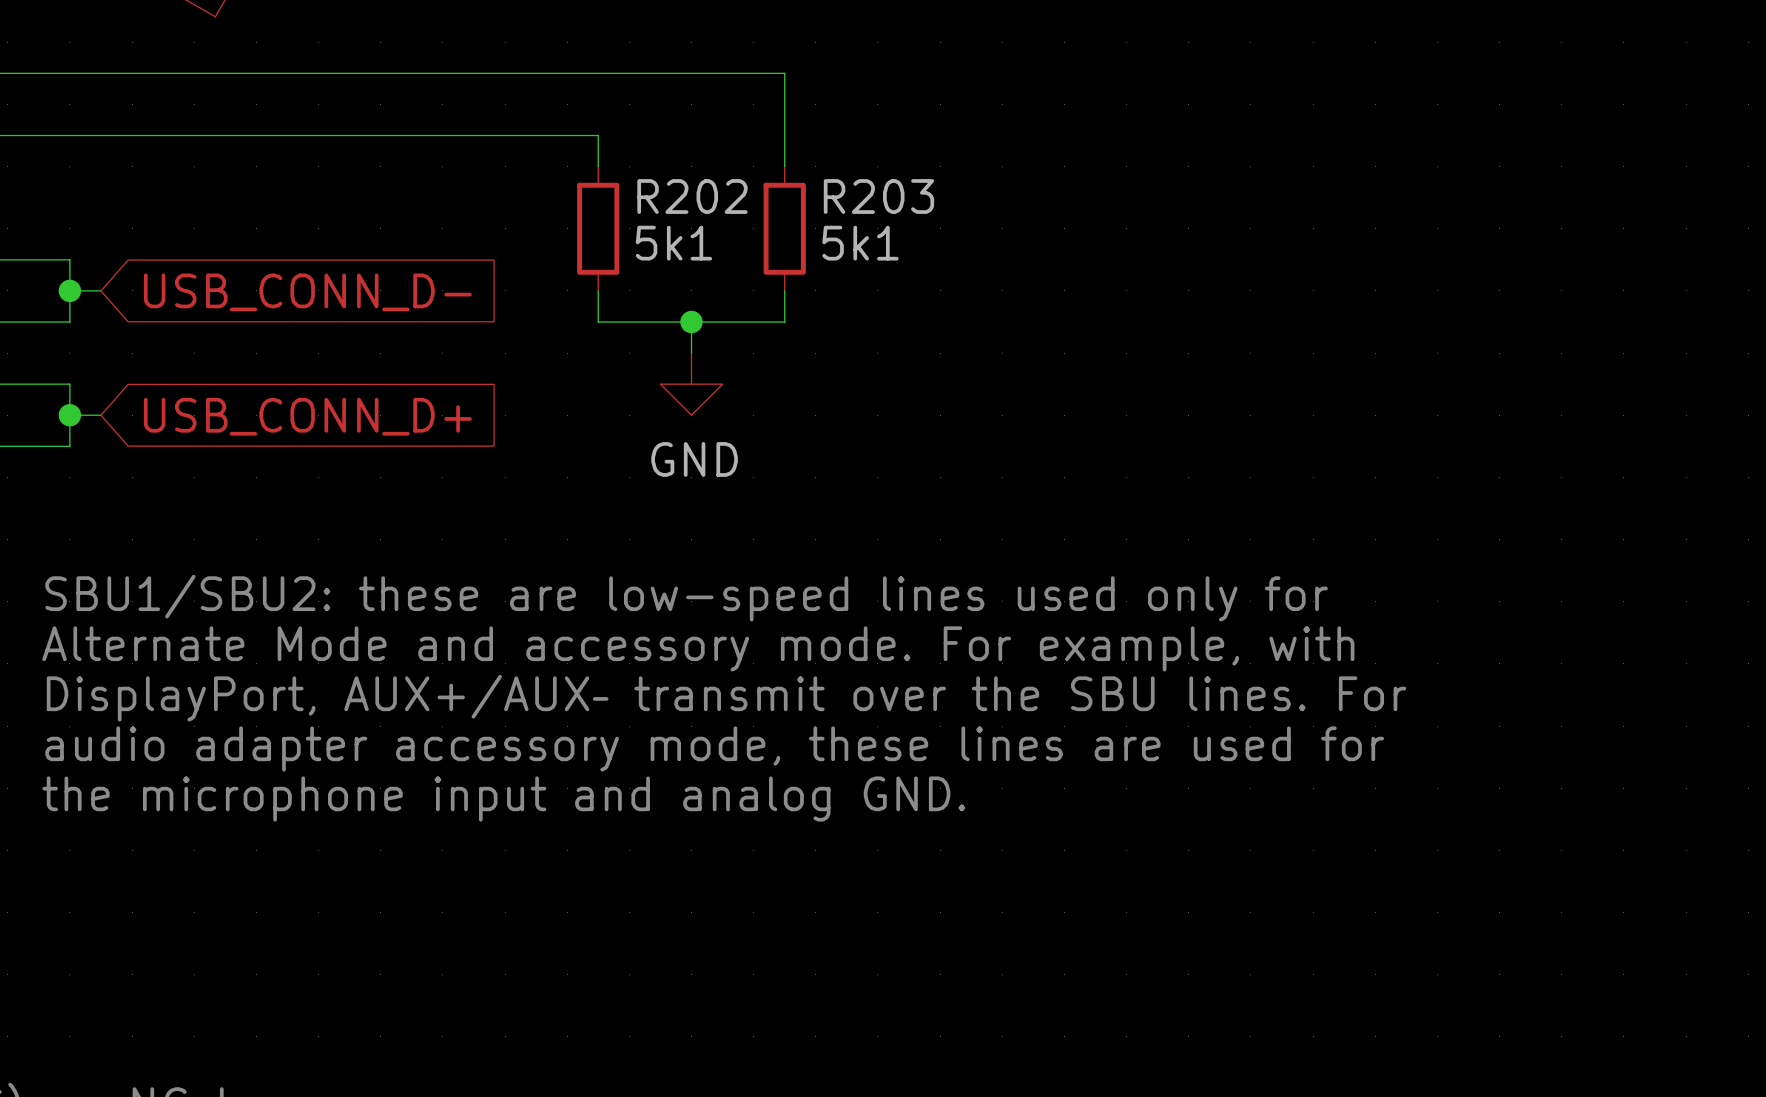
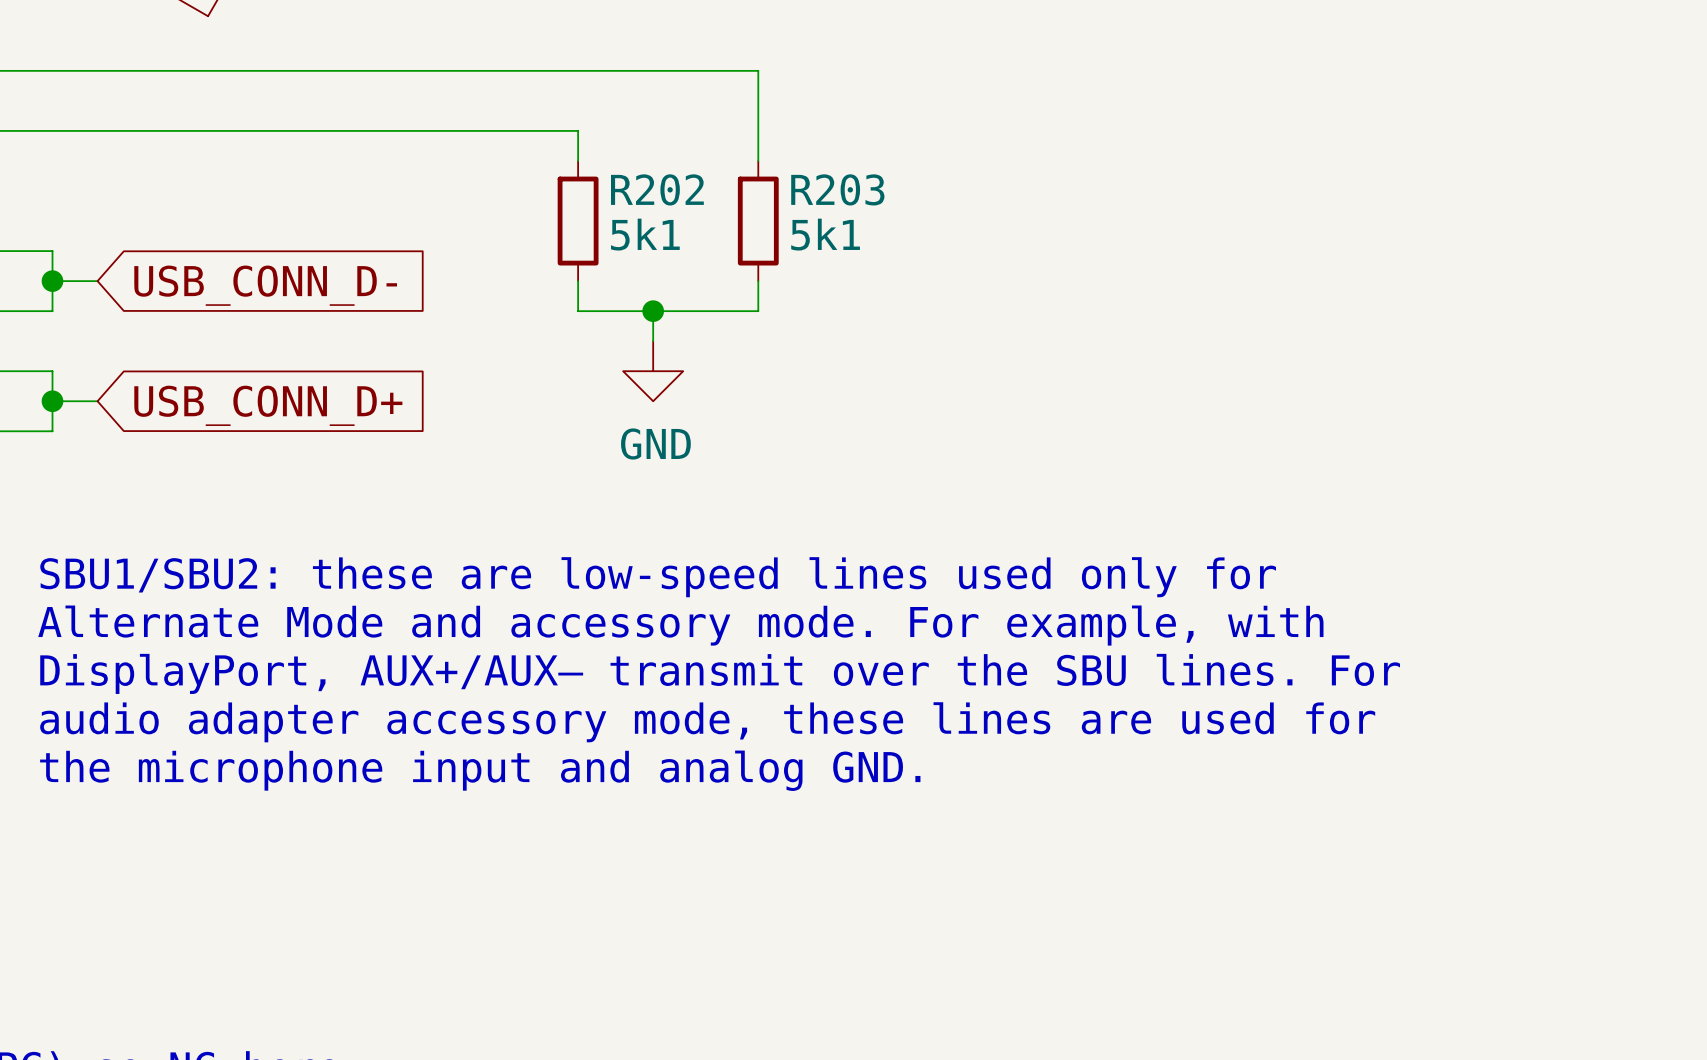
wire: (54, 259) (69, 259) (69, 321) (54, 321) -> (52, 251) (52, 311)
junction position: (69, 290) -> (52, 281)
wire: (691, 321) (691, 353) -> (653, 311) (653, 341)
junction position: (691, 321) -> (653, 311)
wire: (54, 384) (69, 384) (69, 446) (54, 446) -> (52, 371) (52, 431)
power symbol position: GND (691, 384) -> GND (653, 371)
junction position: (69, 415) -> (52, 401)

